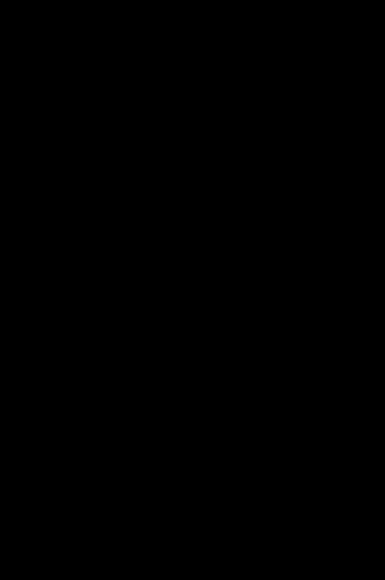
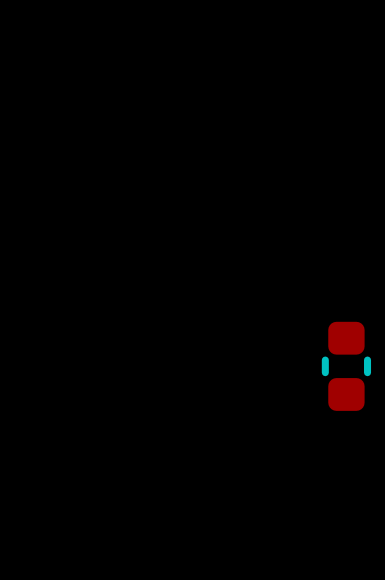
part: none -> (346, 366)

